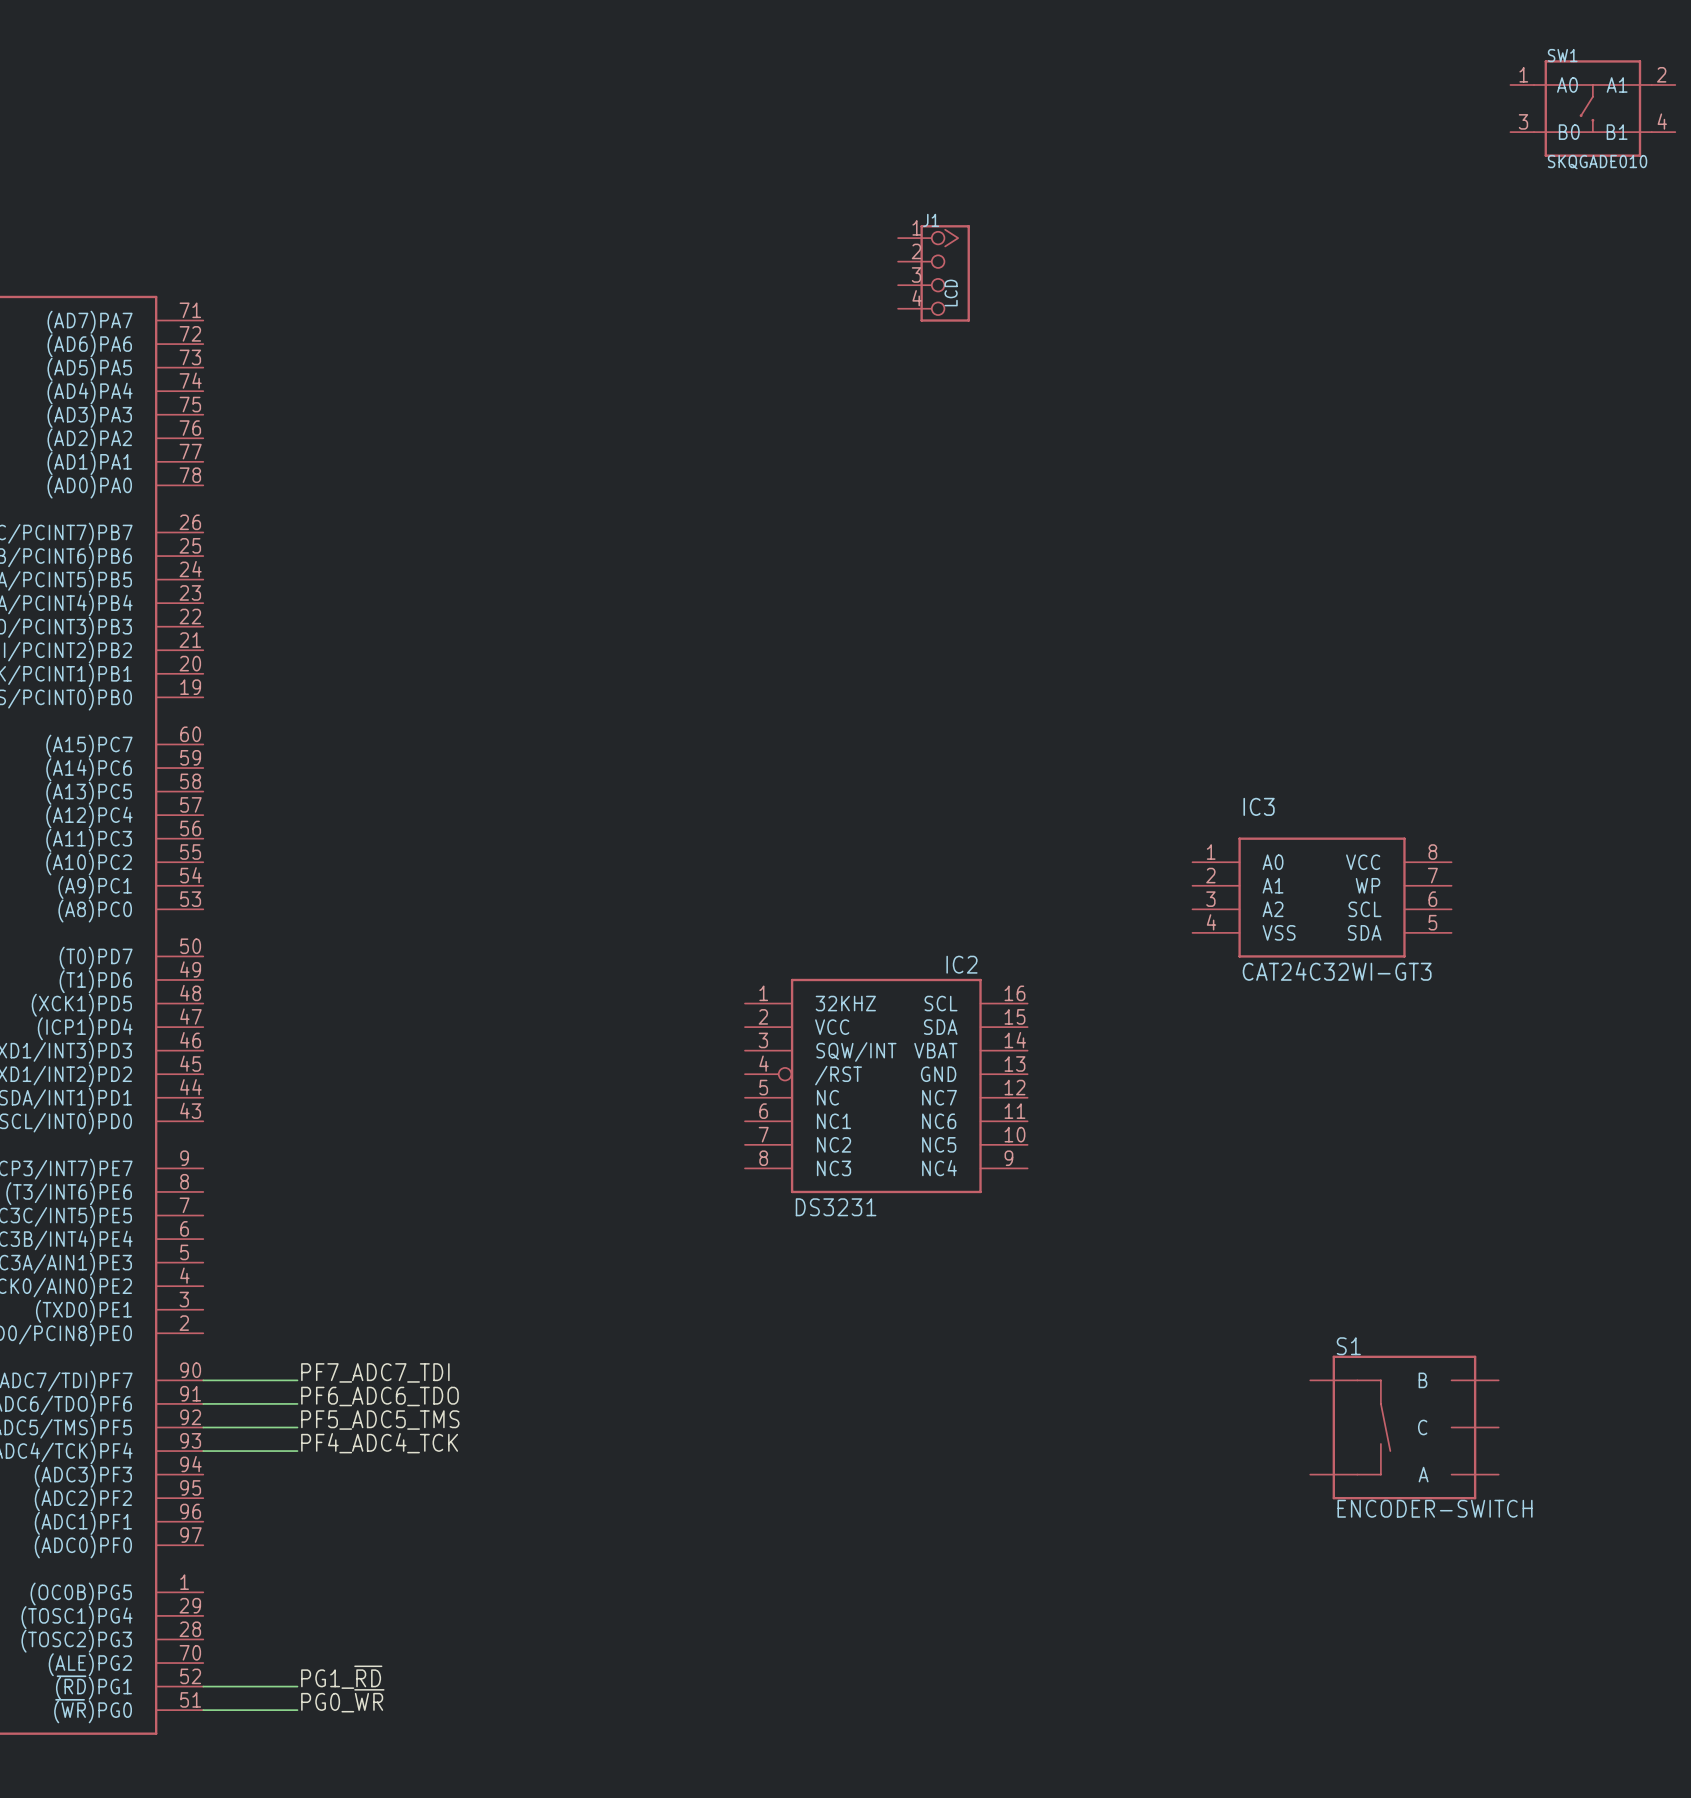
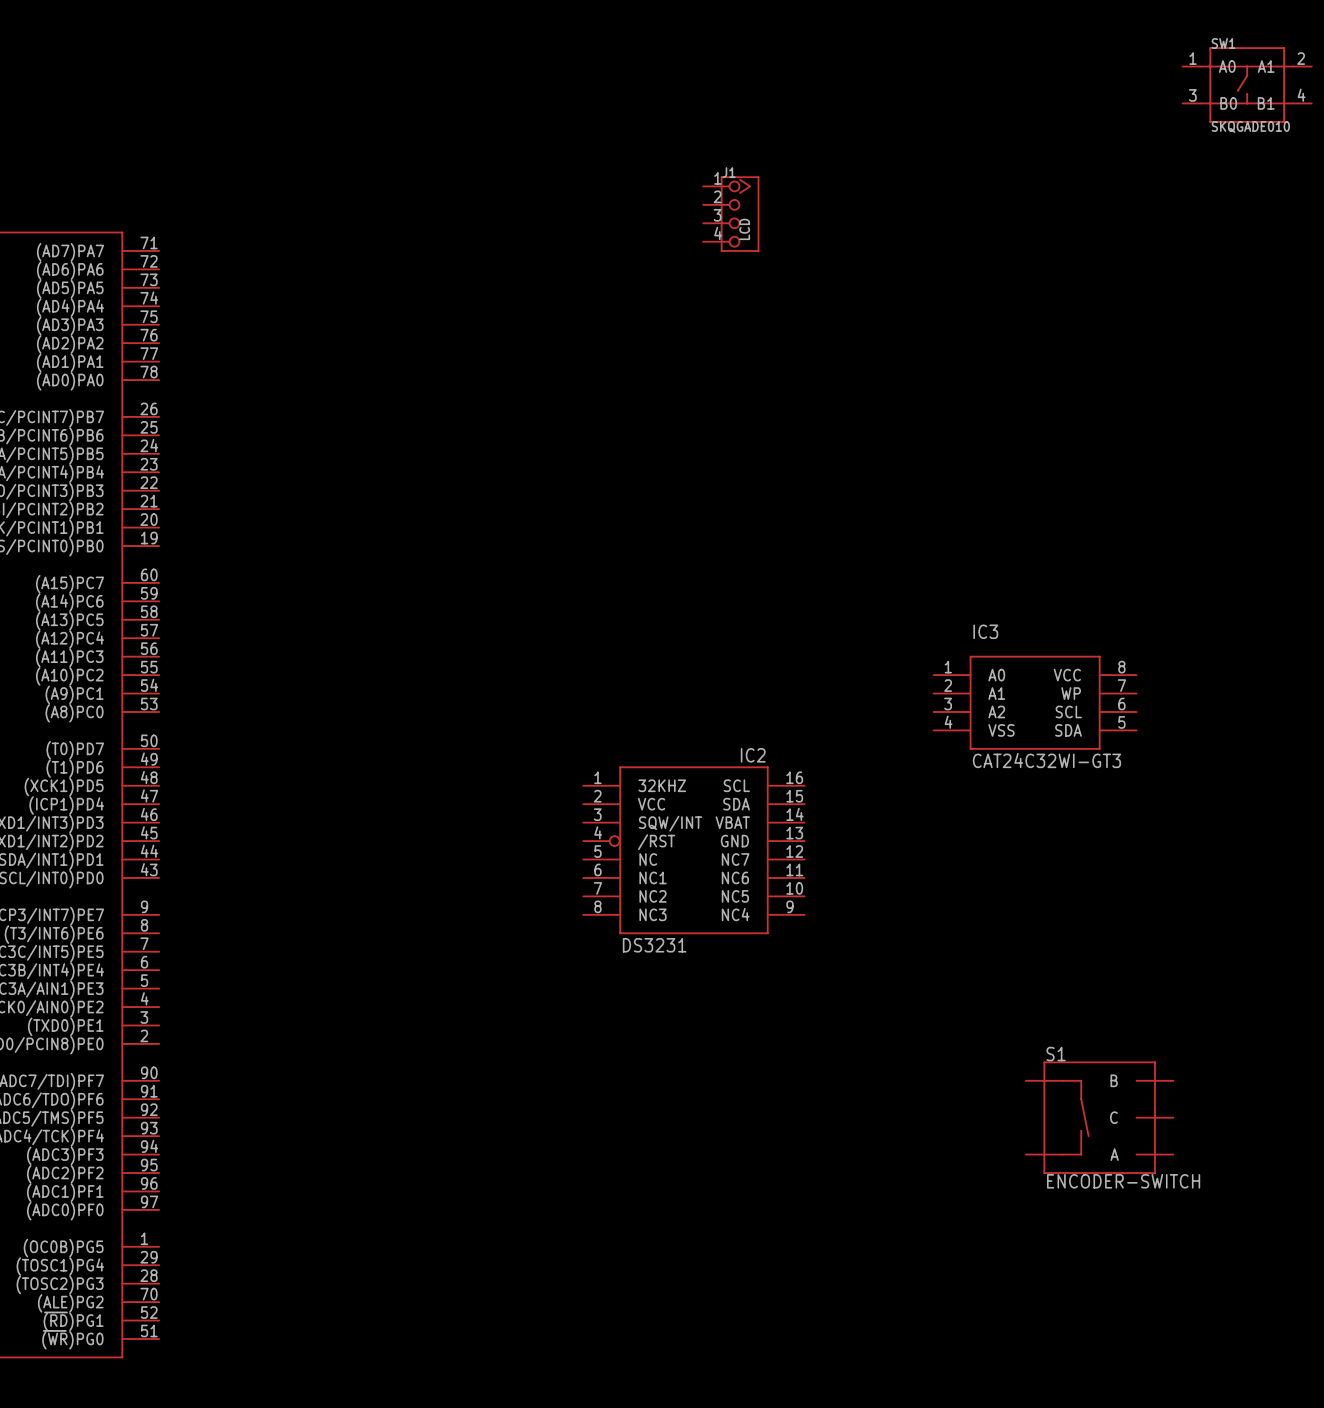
label: PF7_ADC7_TDI (375, 1372) -> none
wire: (203, 1380) (297, 1380) -> none
label: PF6_ADC6_TDO (379, 1396) -> none
wire: (203, 1403) (297, 1403) -> none
label: PF5_ADC5_TMS (380, 1420) -> none
wire: (203, 1427) (297, 1427) -> none
label: PF4_ADC4_TCK (379, 1443) -> none
wire: (203, 1451) (297, 1451) -> none
label: PG1_~{RD} (341, 1677) -> none
wire: (203, 1686) (297, 1686) -> none
label: PG0_~{WR} (342, 1700) -> none
wire: (203, 1710) (297, 1710) -> none

